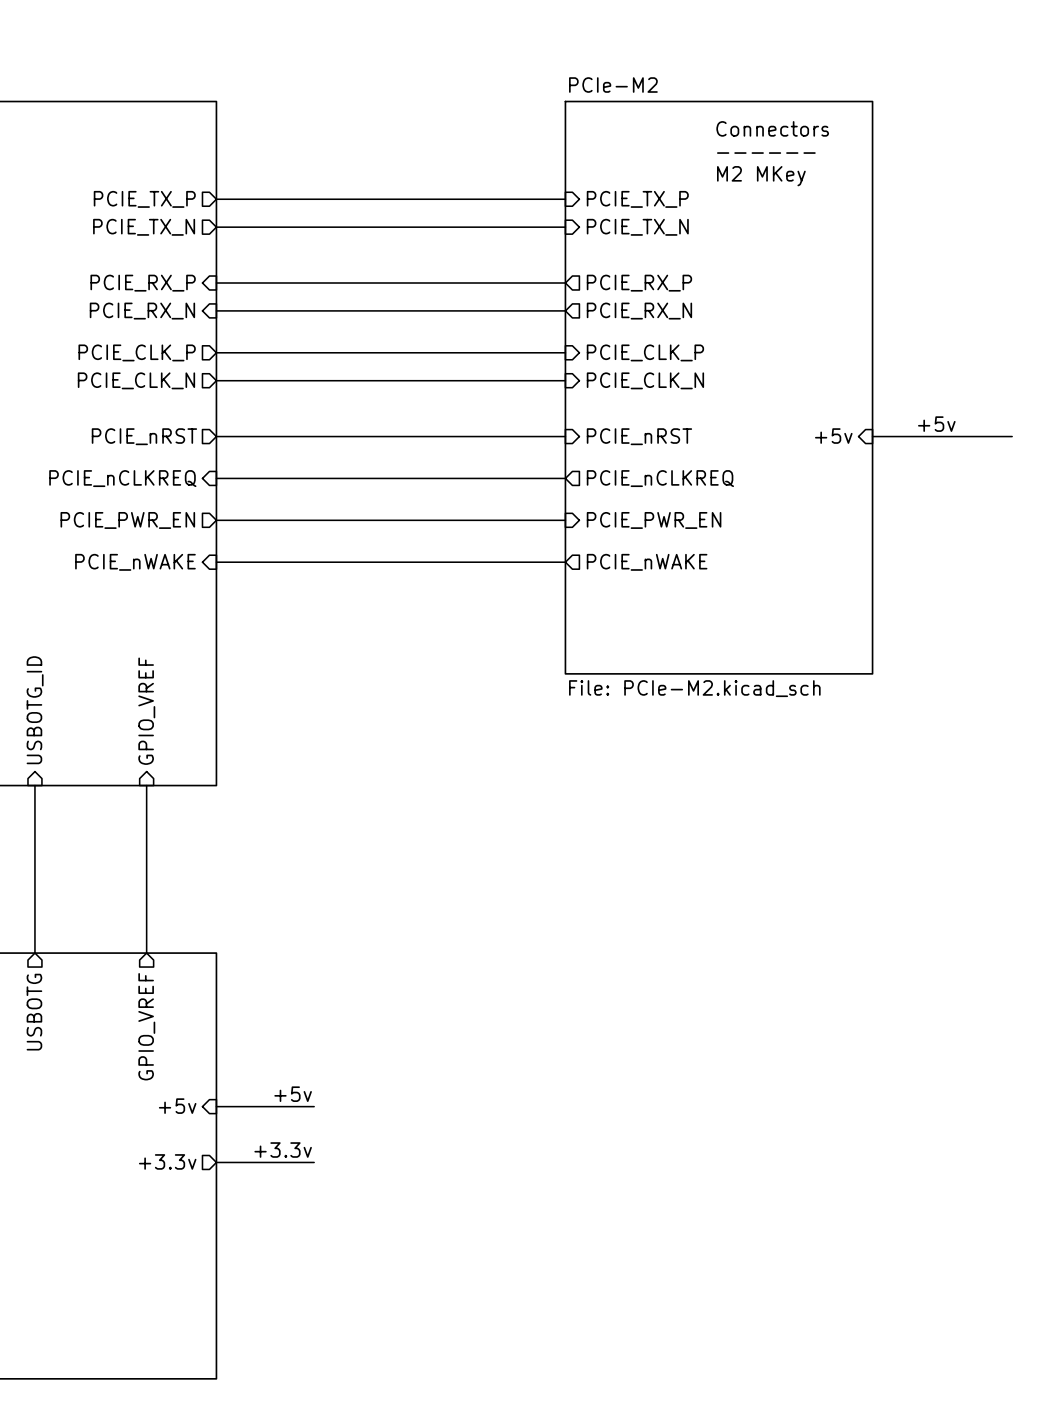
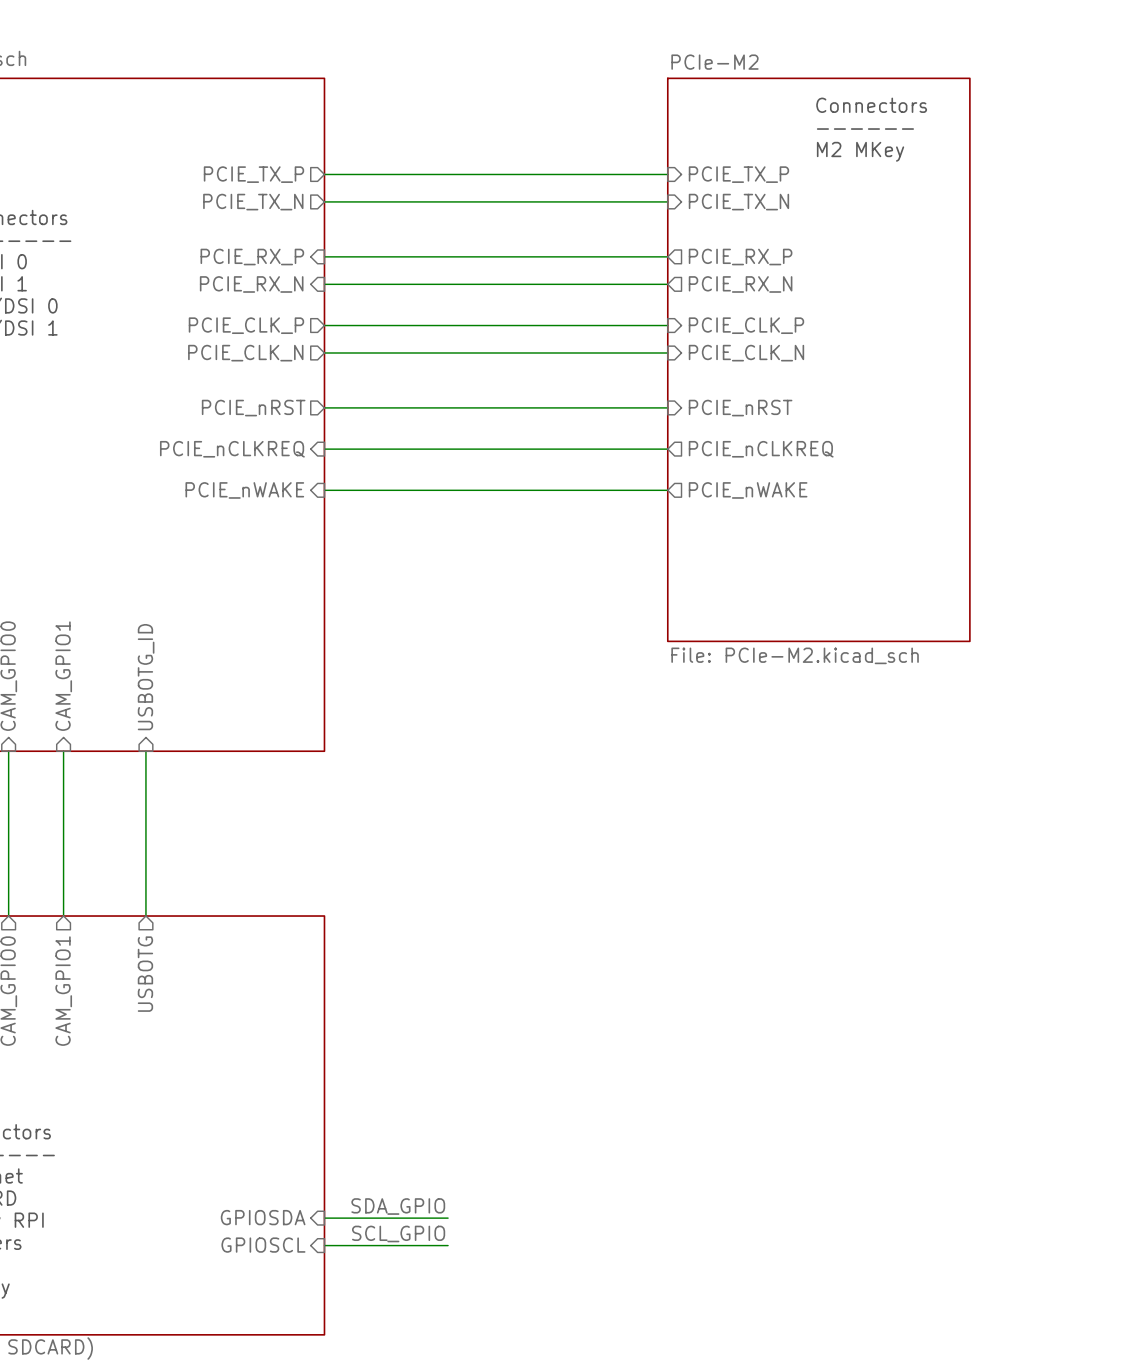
label: +5v (936, 424) -> none
sheet pin: +5v (833, 436) -> none
wire: (872, 436) (1012, 436) -> none
sheet pin shape: output (127, 520) -> input (244, 490)
sheet pin: PCIE_PWR_EN (127, 520) -> PCIE_nWAKE (244, 490)
sheet pin shape: input (654, 520) -> output (748, 490)
sheet pin: PCIE_PWR_EN (654, 520) -> PCIE_nWAKE (748, 490)
sheet pin: PCIE_nWAKE (135, 562) -> none
wire: (216, 562) (565, 562) -> none
sheet pin: PCIE_nWAKE (647, 562) -> none
sheet pin: GPIO_VREF (146, 711) -> none
wire: (146, 785) (146, 953) -> none
sheet pin: GPIO_VREF (146, 1026) -> none
label: +5v (293, 1094) -> none
sheet pin: +5v (177, 1106) -> none
wire: (216, 1106) (314, 1106) -> none
label: +3.3v (283, 1150) -> none
sheet pin: +3.3v (167, 1161) -> none
wire: (216, 1162) (314, 1162) -> none
label: none -> SDA_GPIO (398, 1206)
sheet pin: none -> GPIOSDA (263, 1217)
wire: none -> (324, 1218) (448, 1218)
label: none -> SCL_GPIO (398, 1233)
sheet pin: none -> GPIOSCL (263, 1245)
wire: none -> (324, 1245) (448, 1245)

